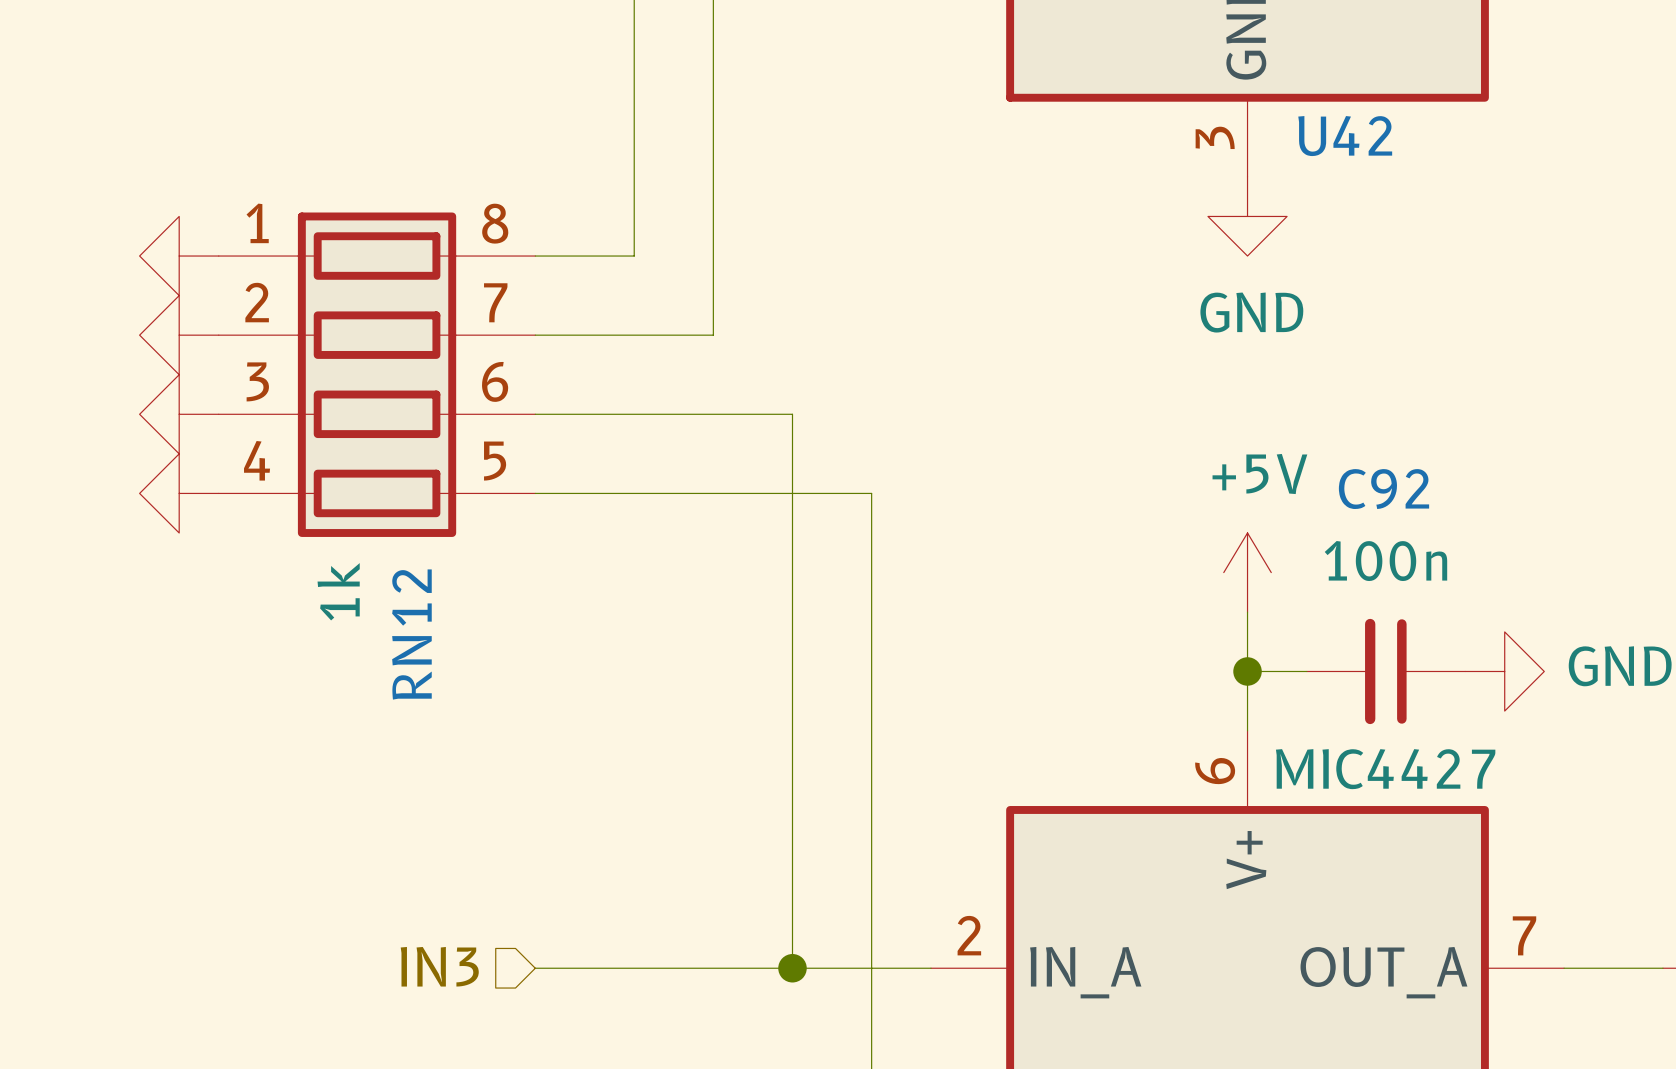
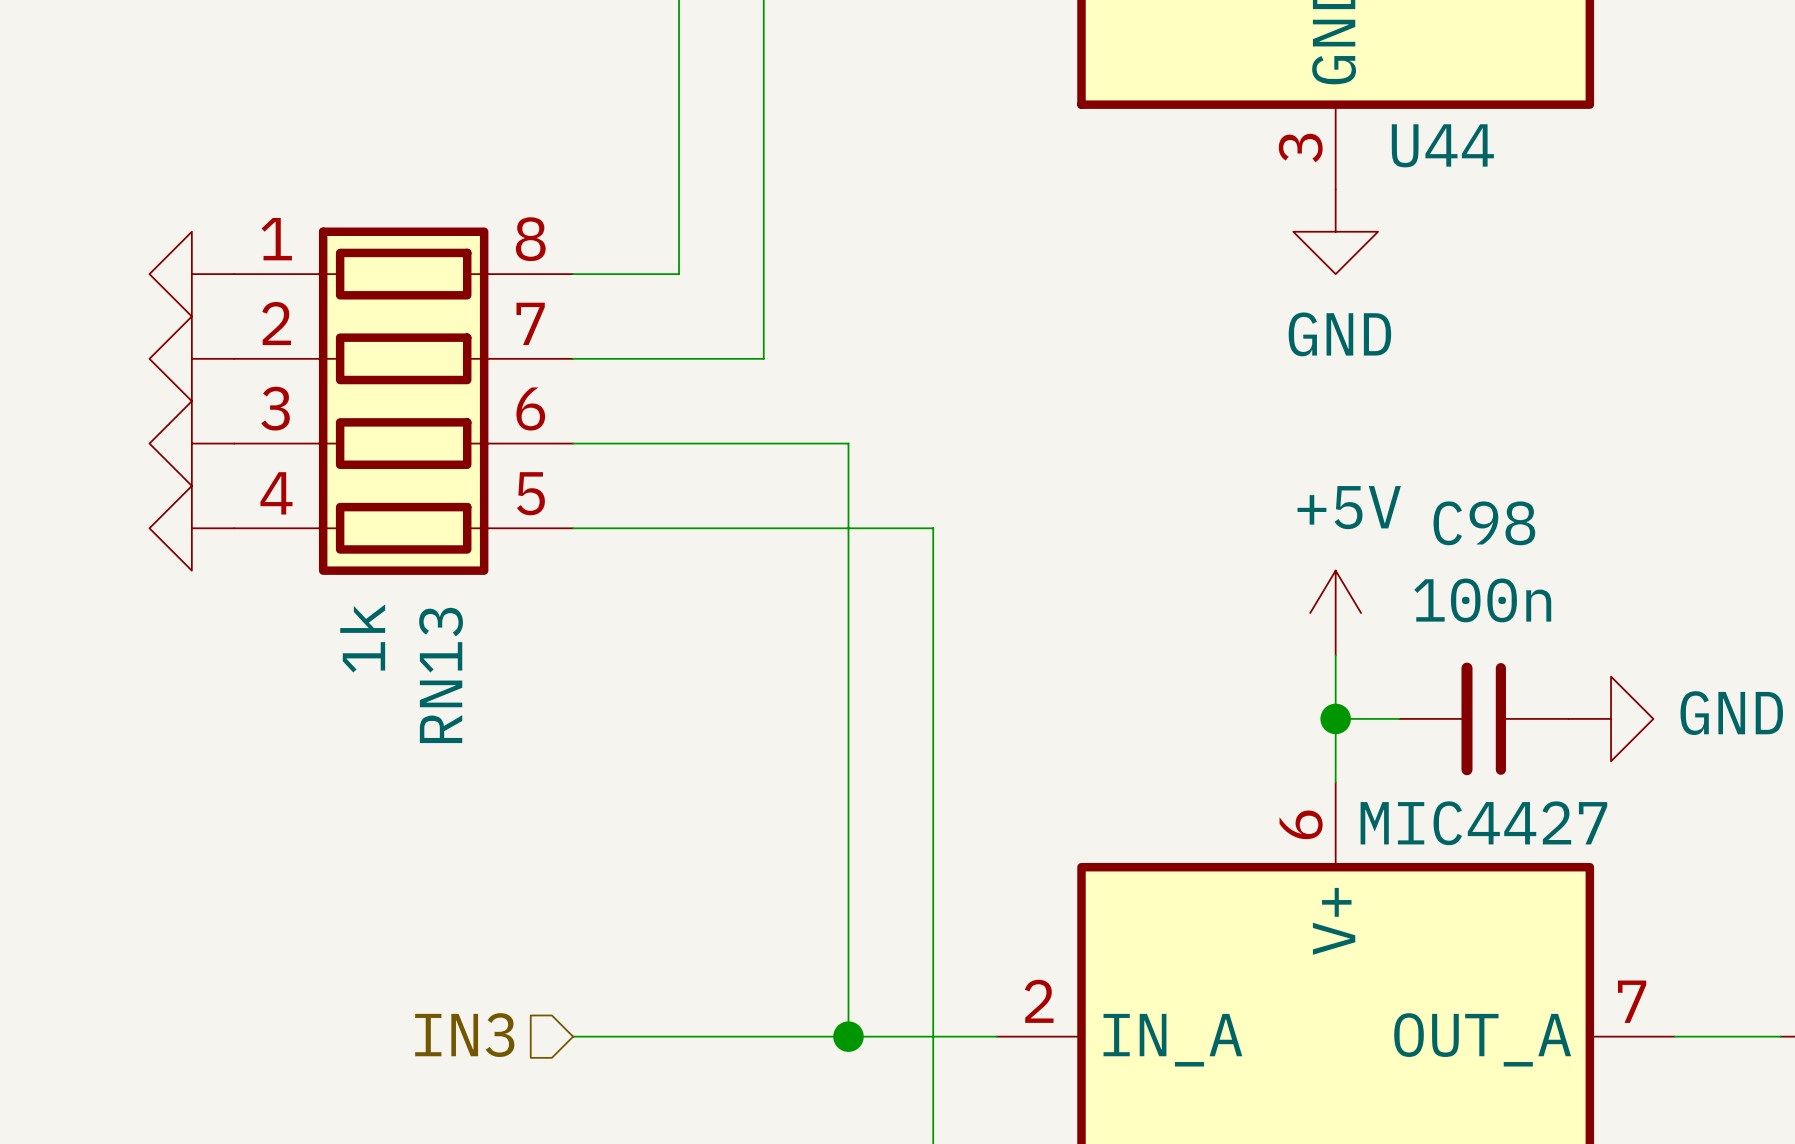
U42 name: U42 (1345, 136) -> U44 (1442, 145)
C92 name: C92 (1383, 489) -> C98 (1484, 523)
RN12 name: RN12 (411, 634) -> RN13 (441, 675)

